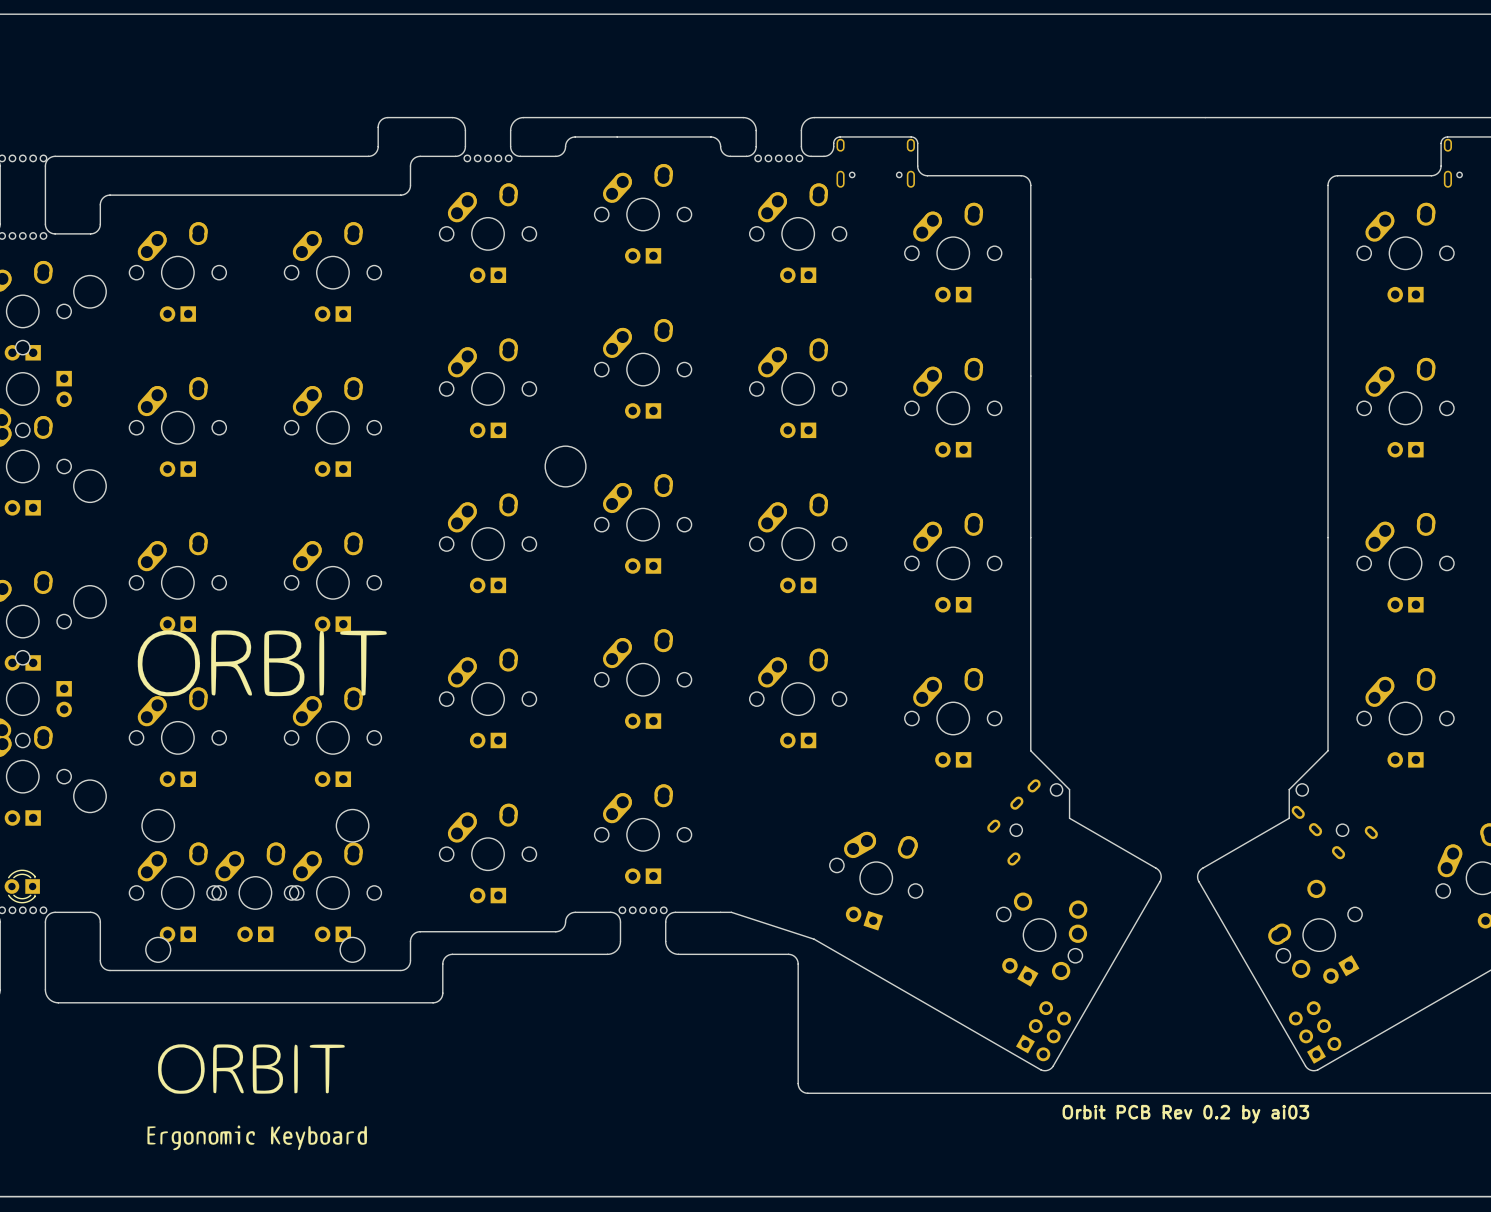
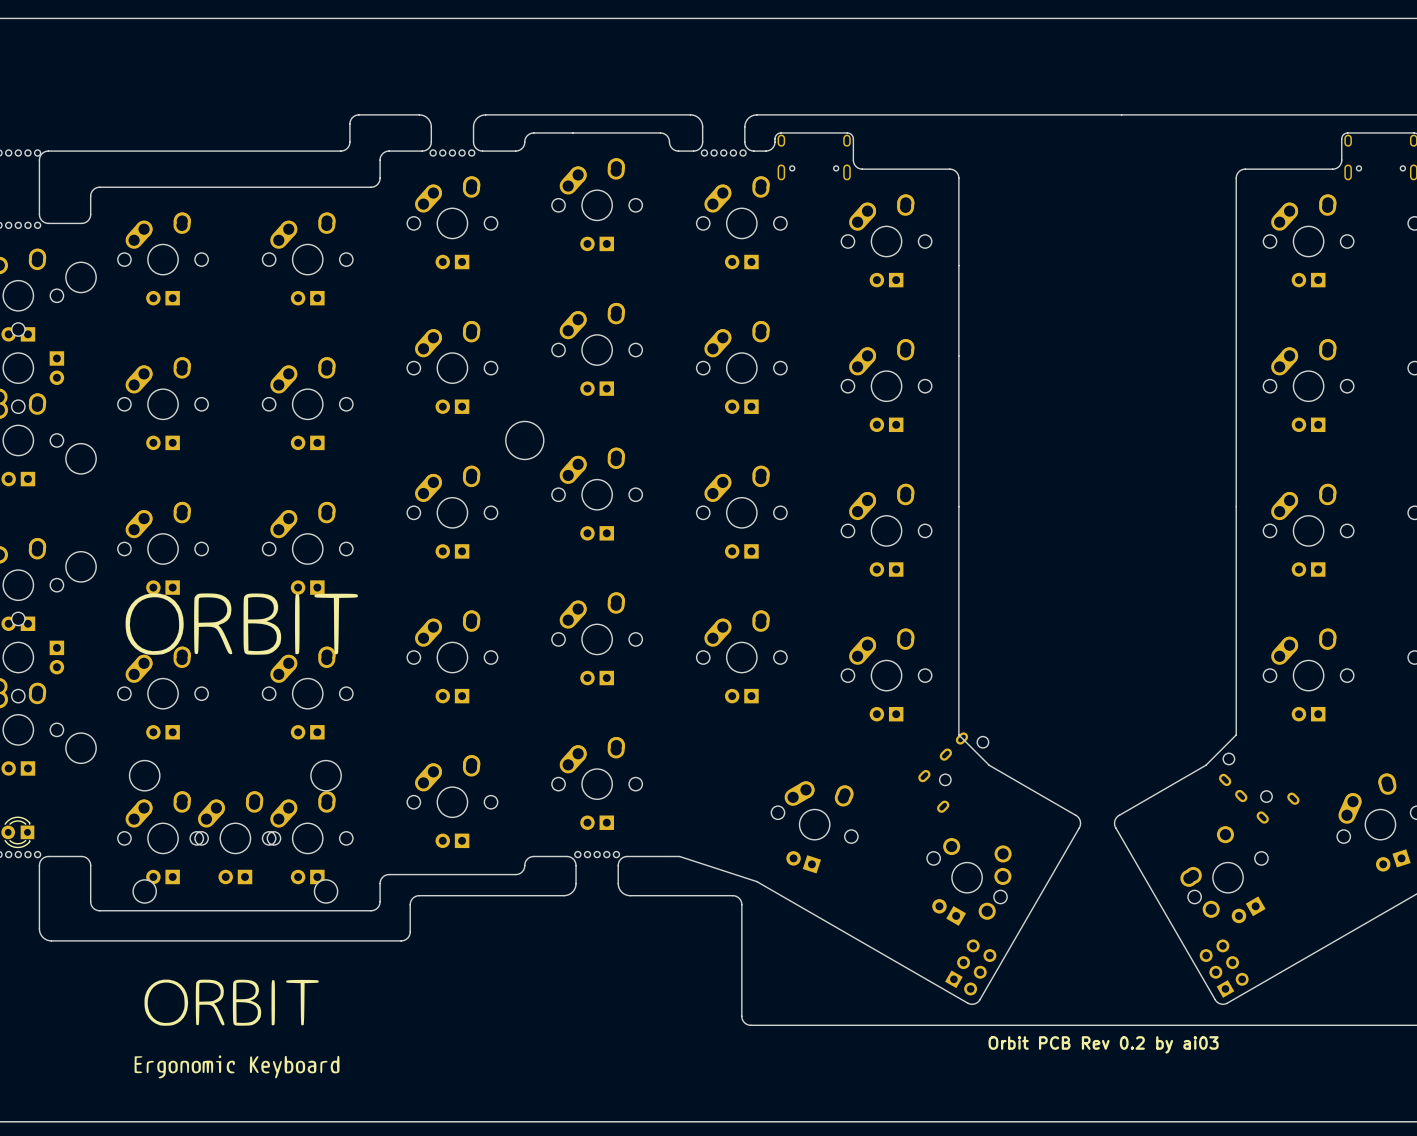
board edge: (1030, 750) (1069, 789) (1069, 818) (1156, 868) -> (958, 705) (958, 734) (989, 765) (1075, 815)
board edge: (1328, 750) (1289, 789) (1289, 818) (1202, 868) -> (1236, 705) (1236, 734) (1205, 765) (1119, 815)
part position: (1334, 821) -> (1259, 788)

